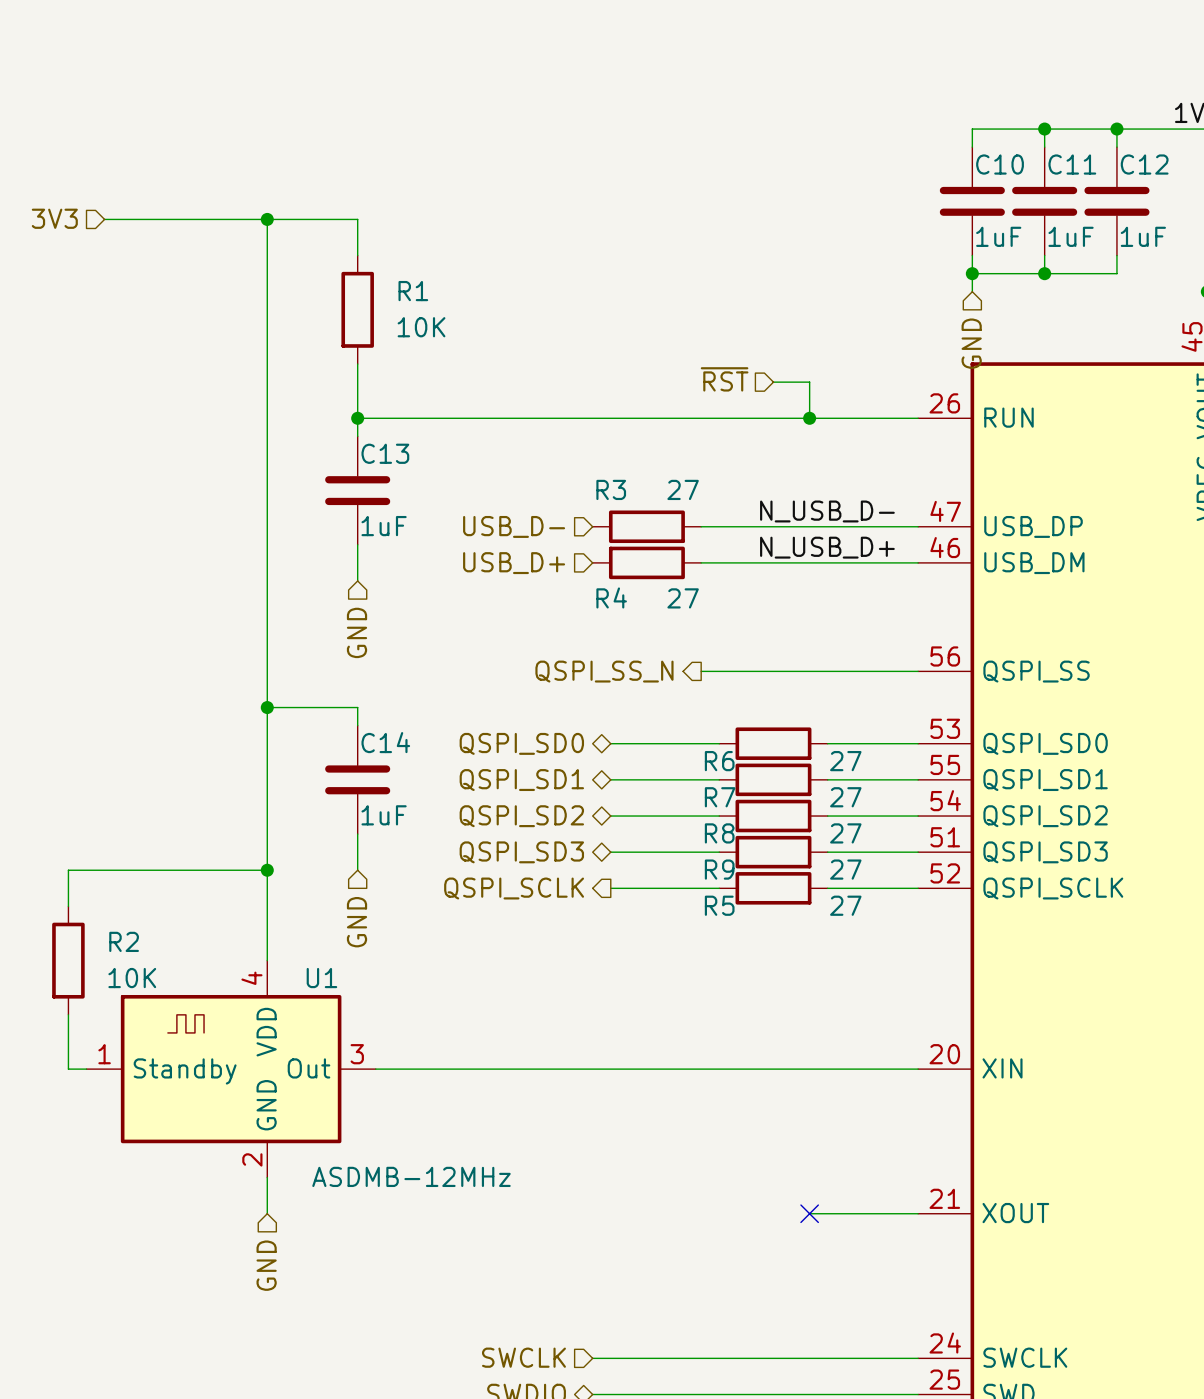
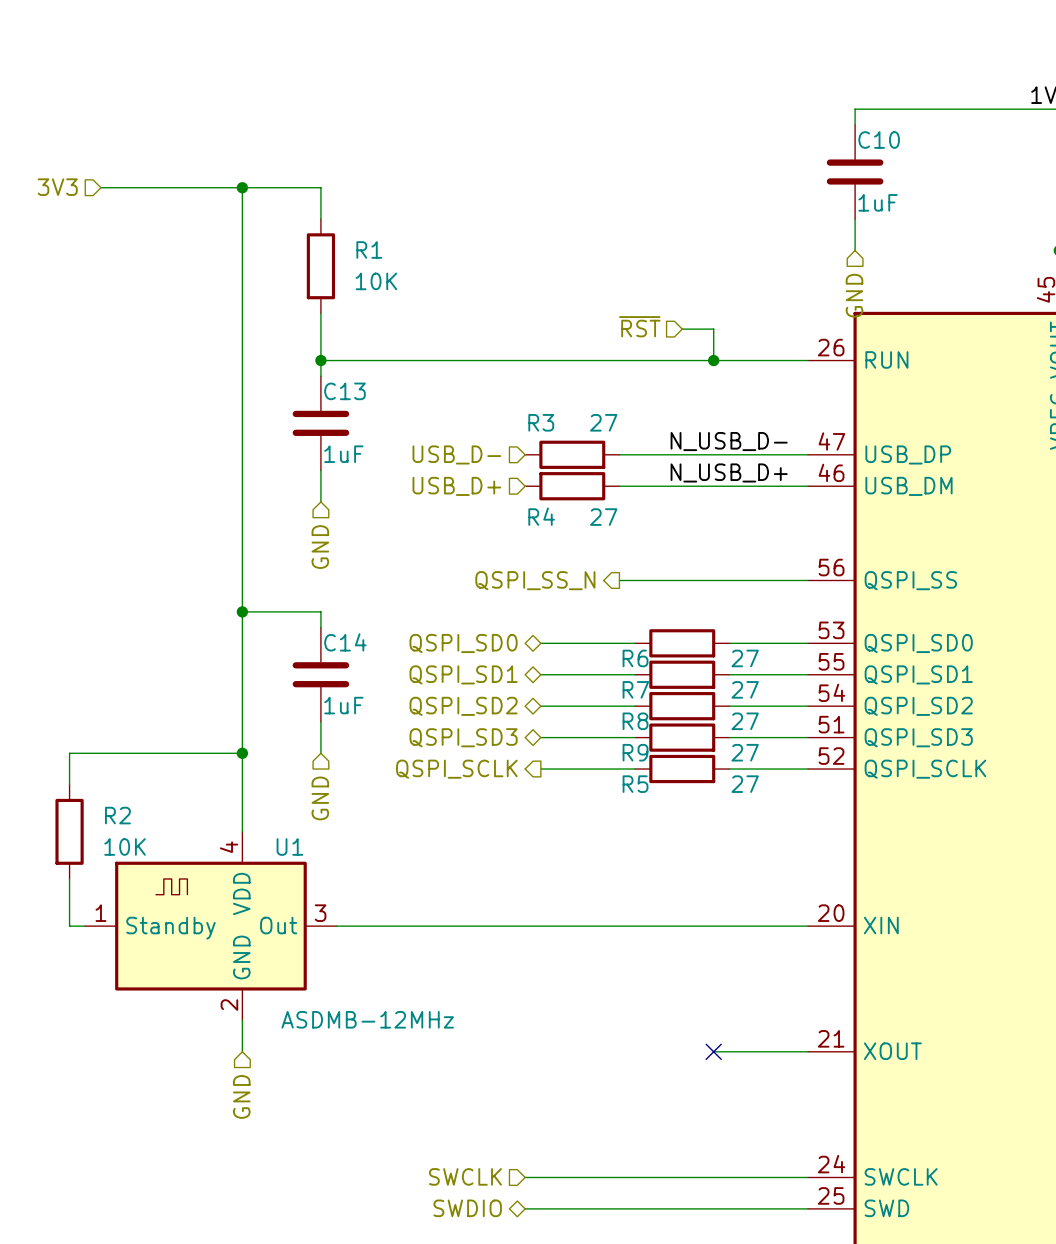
wire: (1044, 129) (1044, 147) -> none
junction: (1044, 129) -> none
wire: (1116, 129) (1116, 147) -> none
junction: (1116, 129) -> none
C11: 1uF (1044, 201) -> none
C12: 1uF (1116, 201) -> none
wire: (1044, 255) (1044, 273) -> none
wire: (1116, 255) (1116, 273) (972, 273) -> none
junction: (972, 273) -> none
junction: (1044, 273) -> none

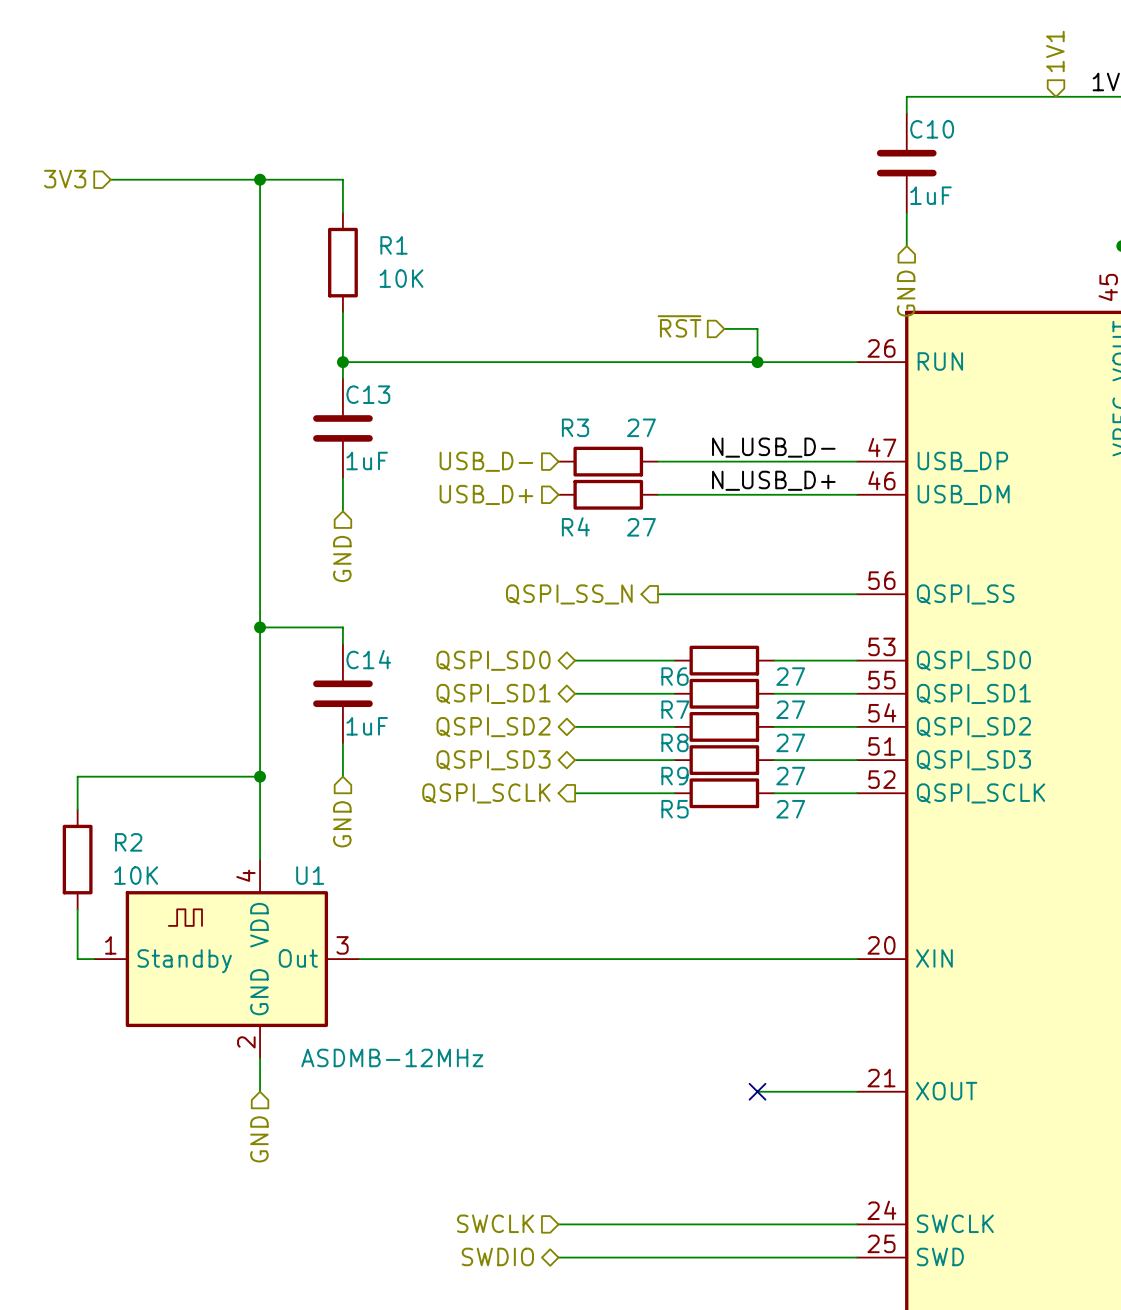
hierarchical label: none -> 1V1 (1055, 51)

